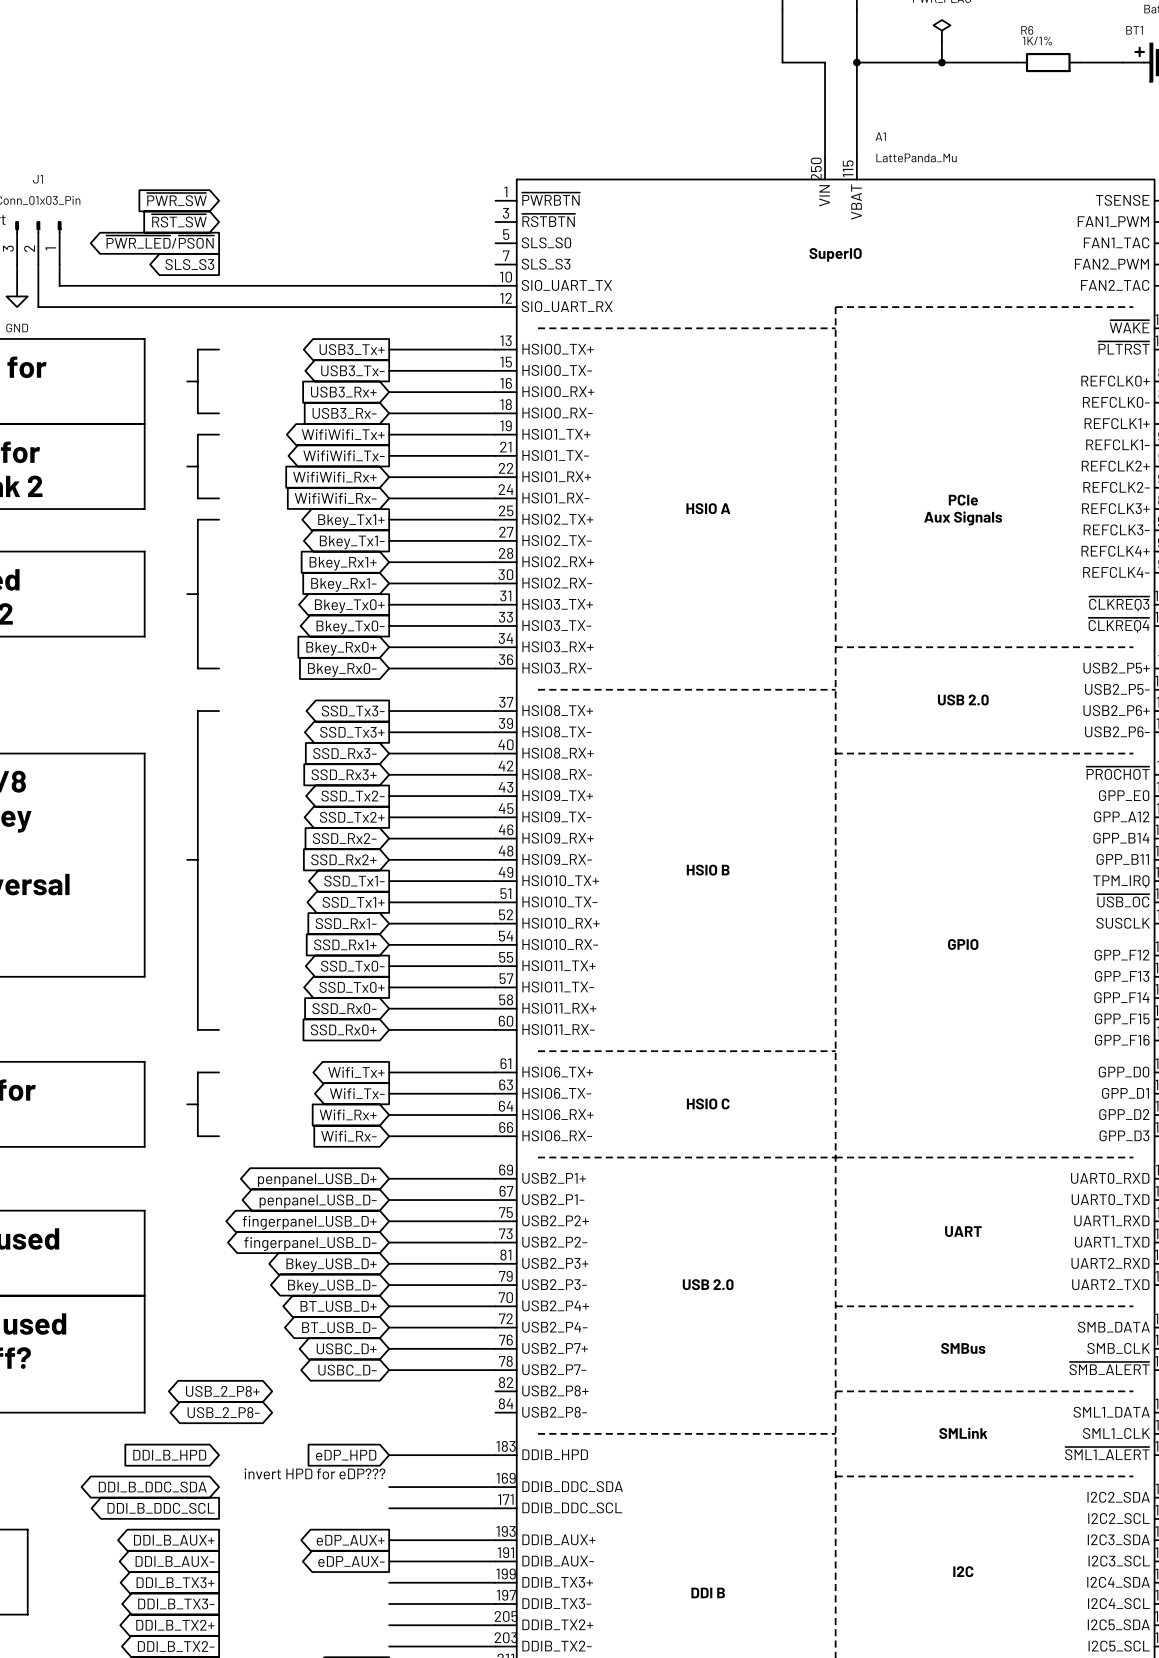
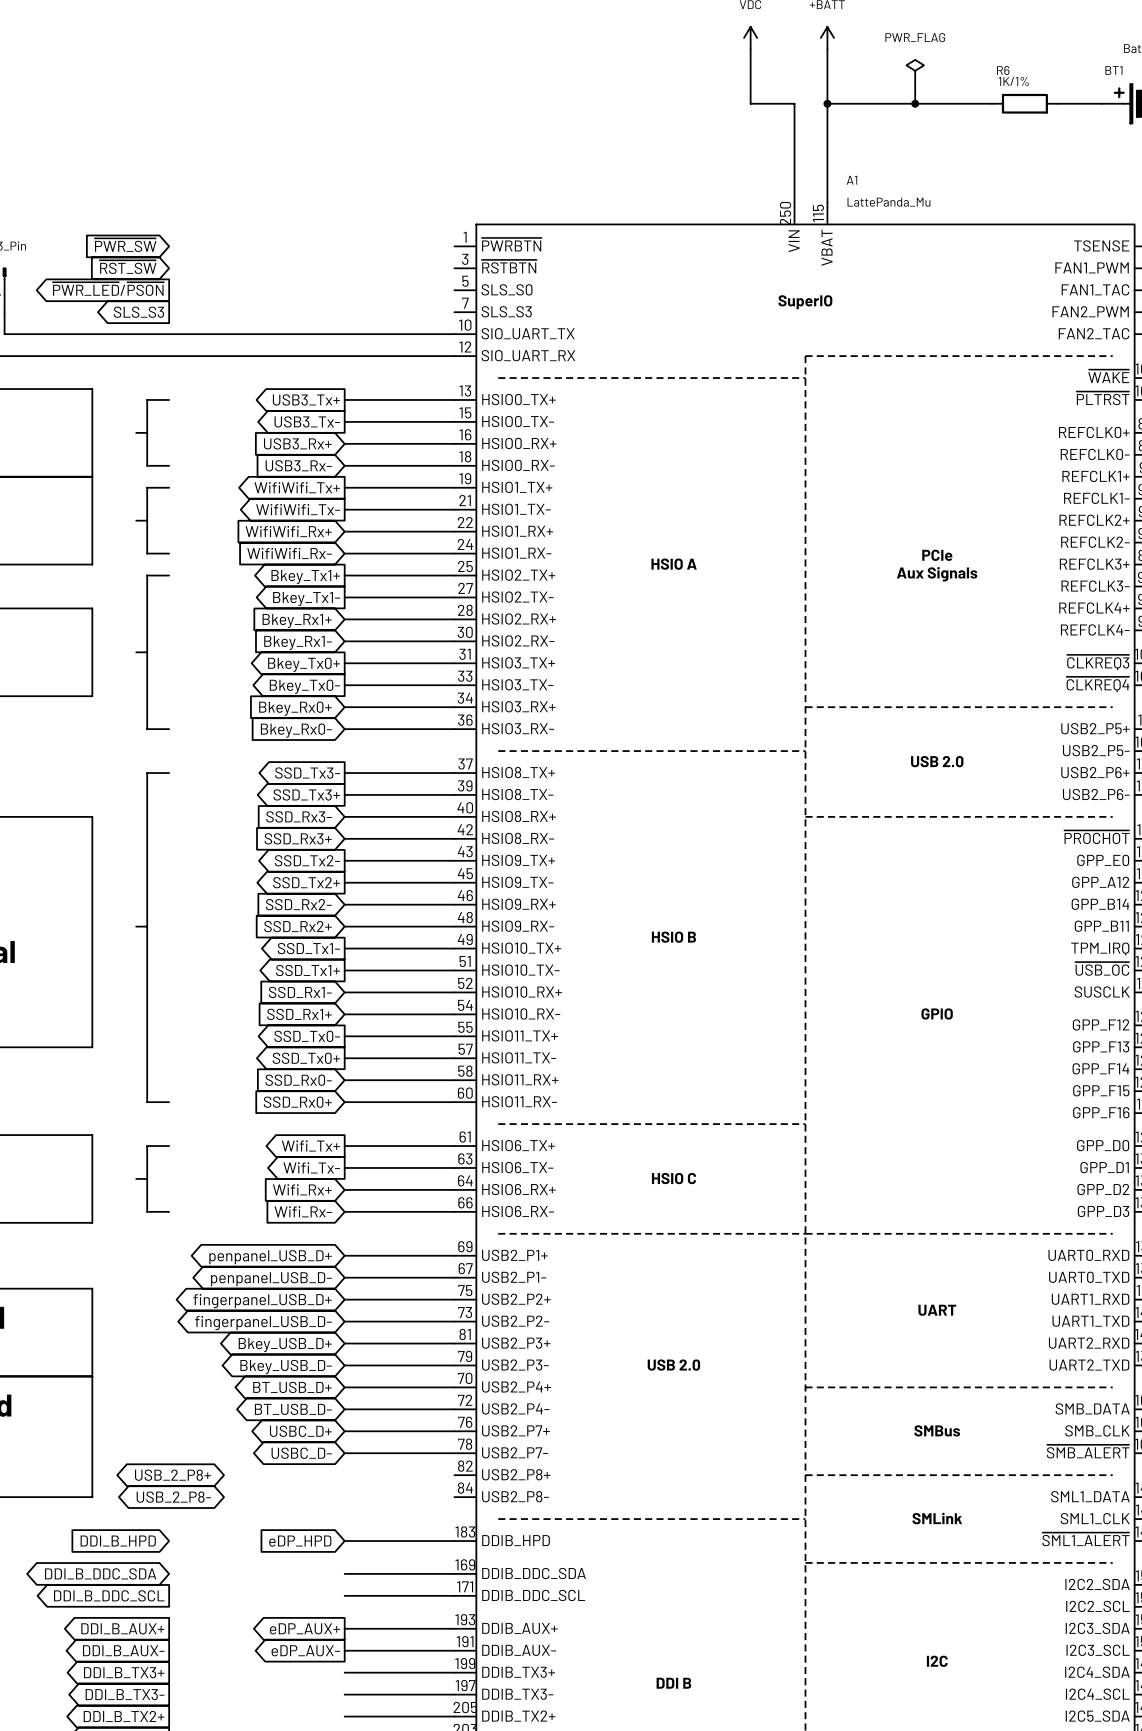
text: invert HPD for eDP??? (314, 1473) -> none

